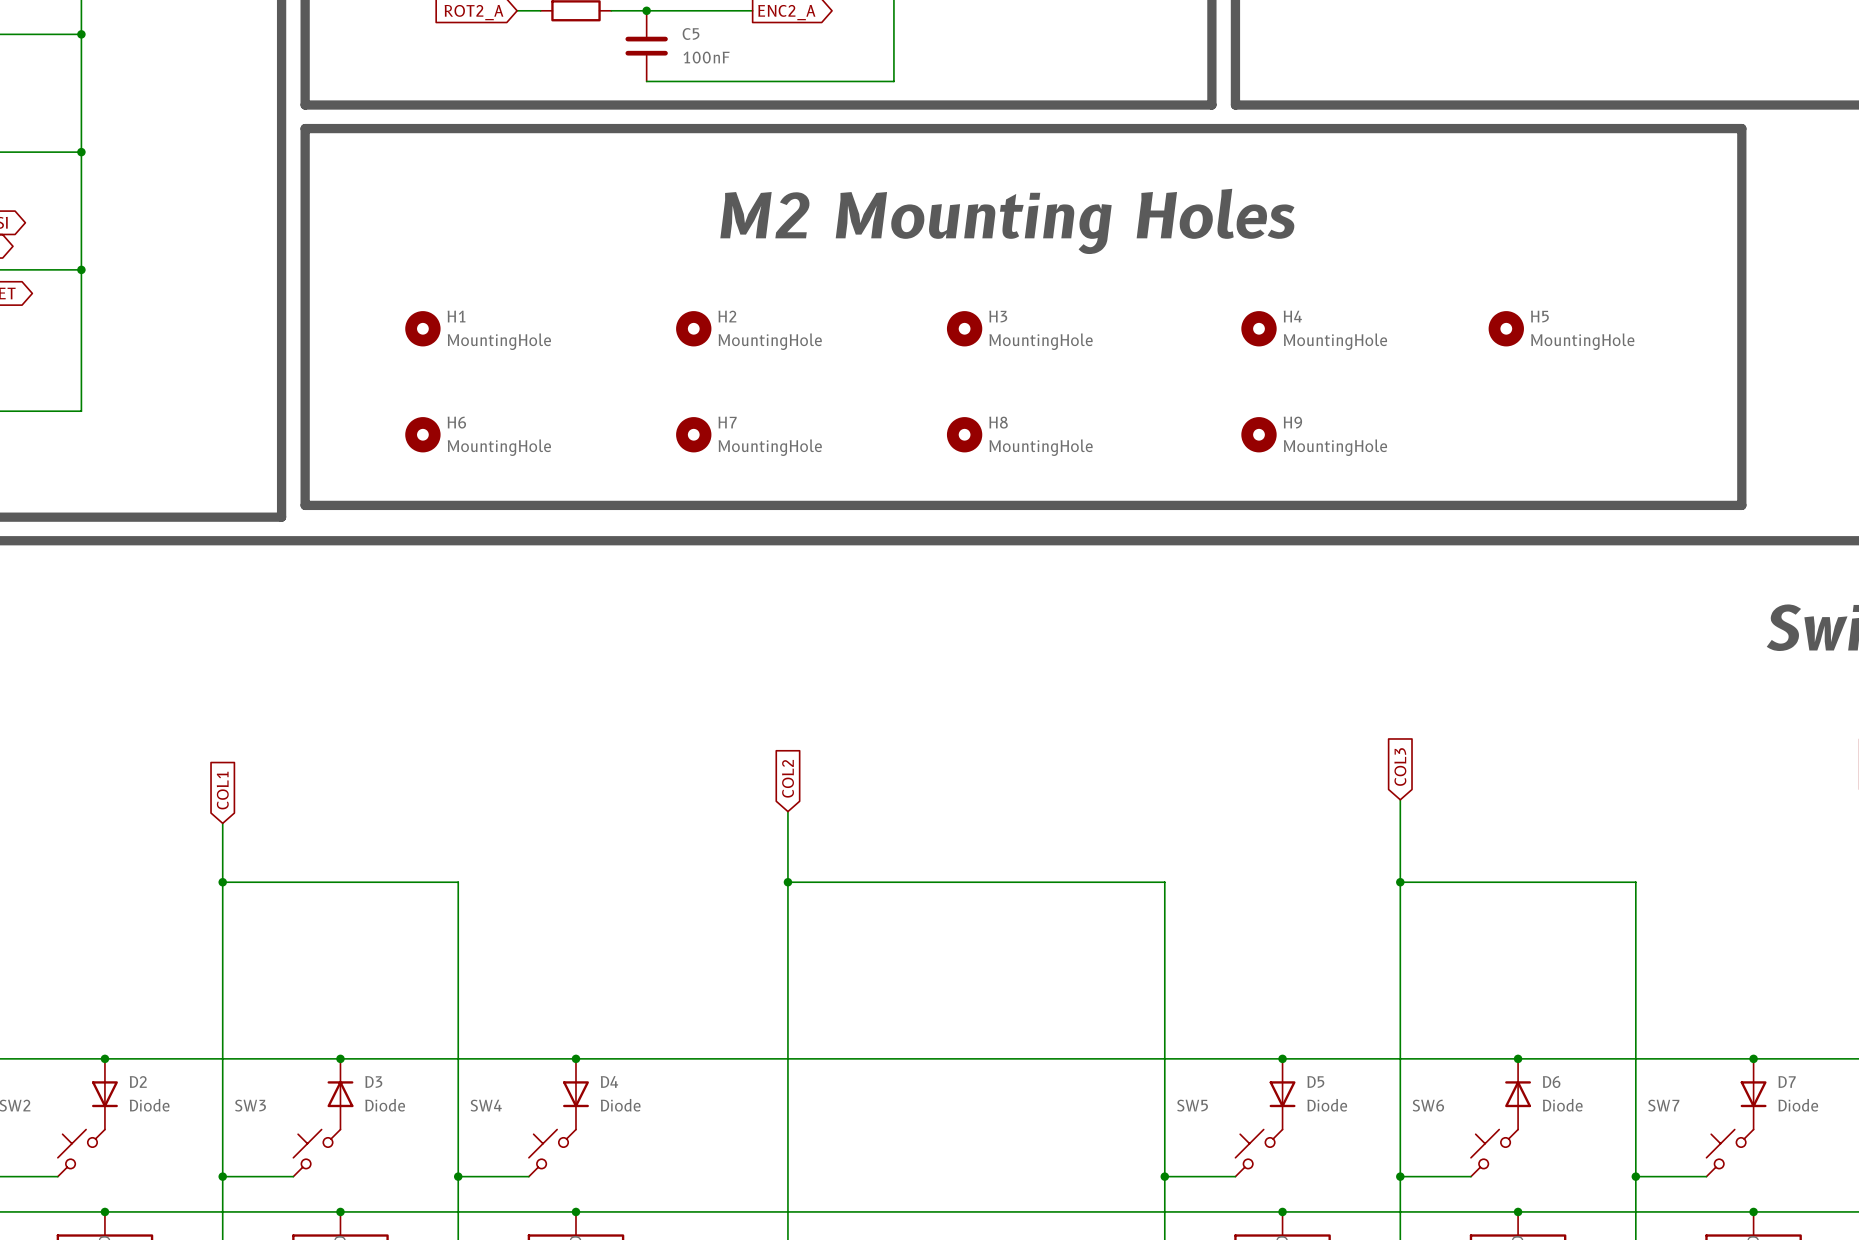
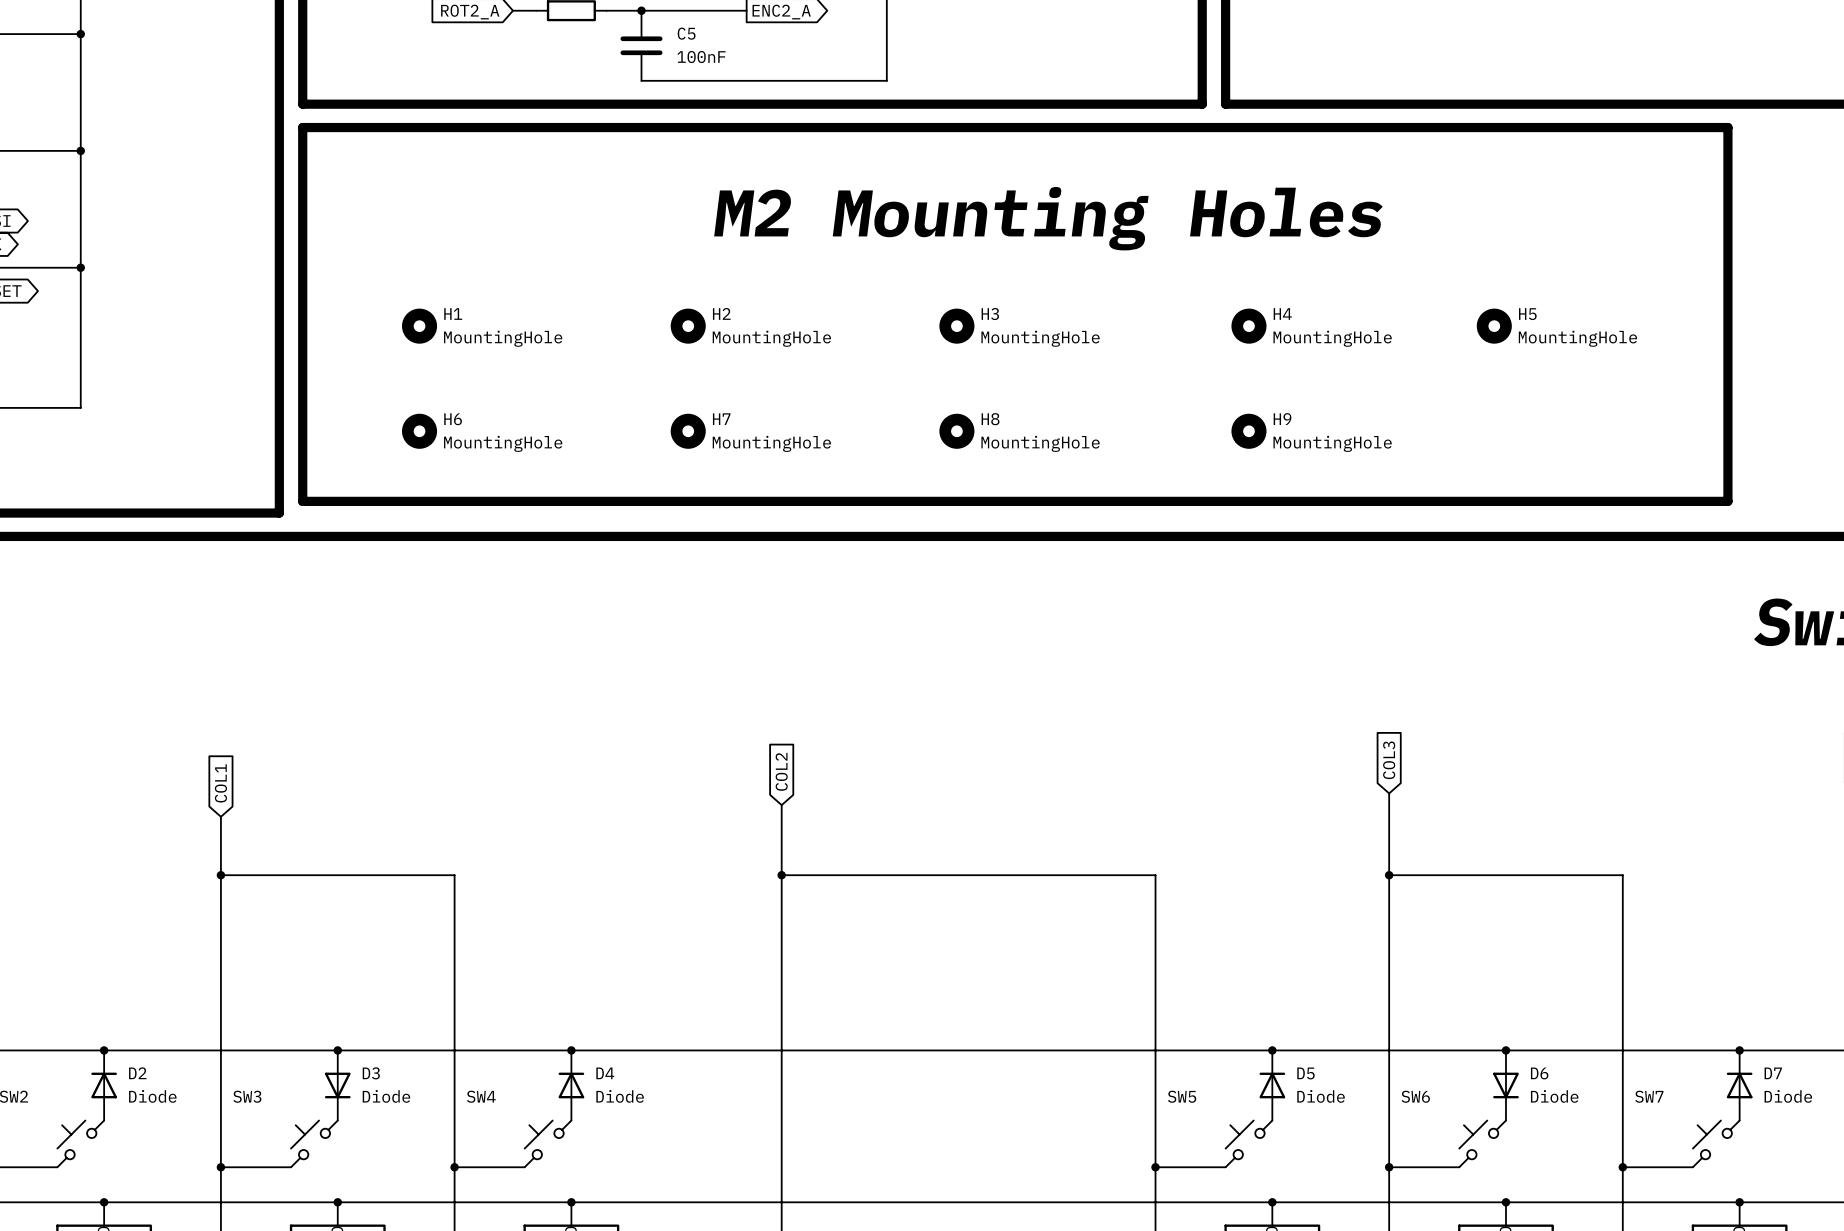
D2 rotation: 0° (104, 1094) -> 180° (104, 1085)
D3 rotation: 0° (340, 1094) -> 180° (337, 1085)
D4 rotation: 0° (575, 1094) -> 180° (571, 1085)
D5 rotation: 0° (1282, 1094) -> 180° (1272, 1085)
D6 rotation: 0° (1518, 1094) -> 180° (1505, 1085)
D7 rotation: 0° (1753, 1094) -> 180° (1739, 1085)

